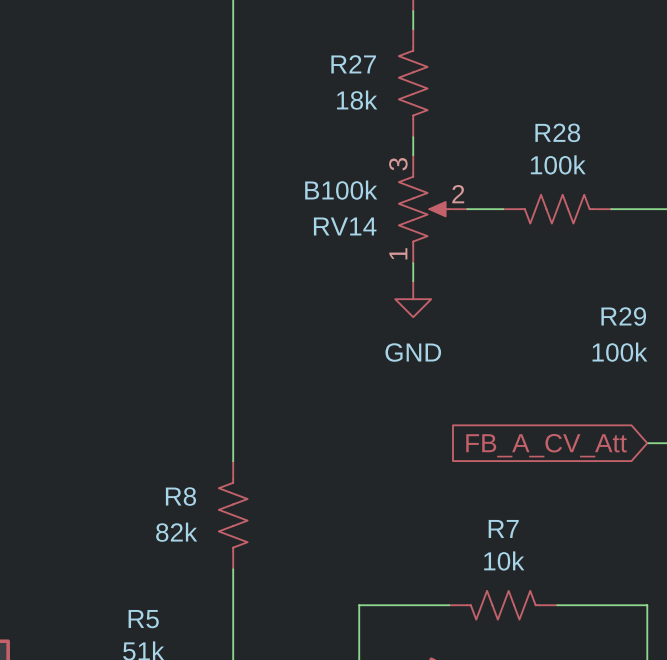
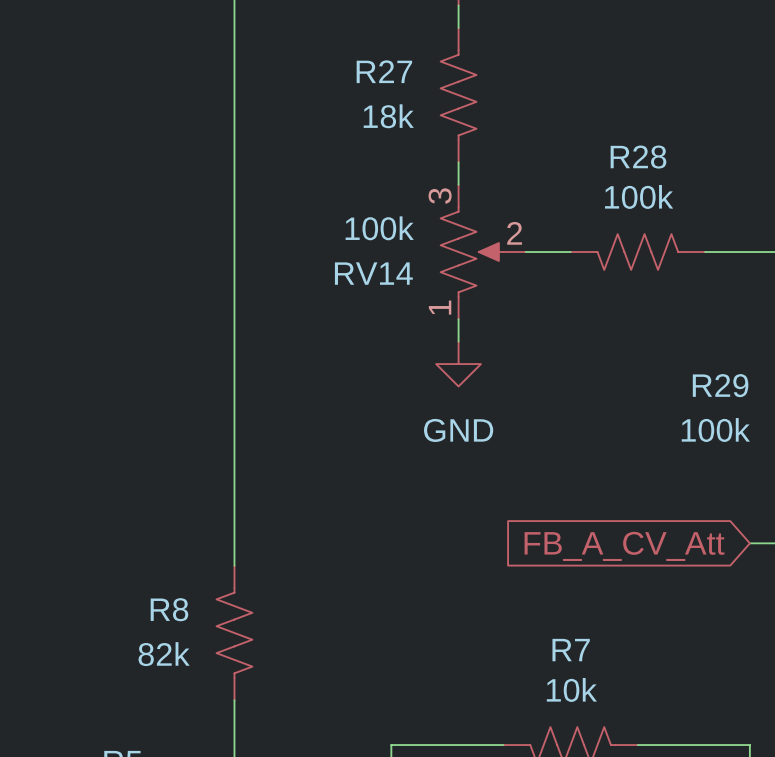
RV14 value: B100k (341, 190) -> 100k (379, 228)

